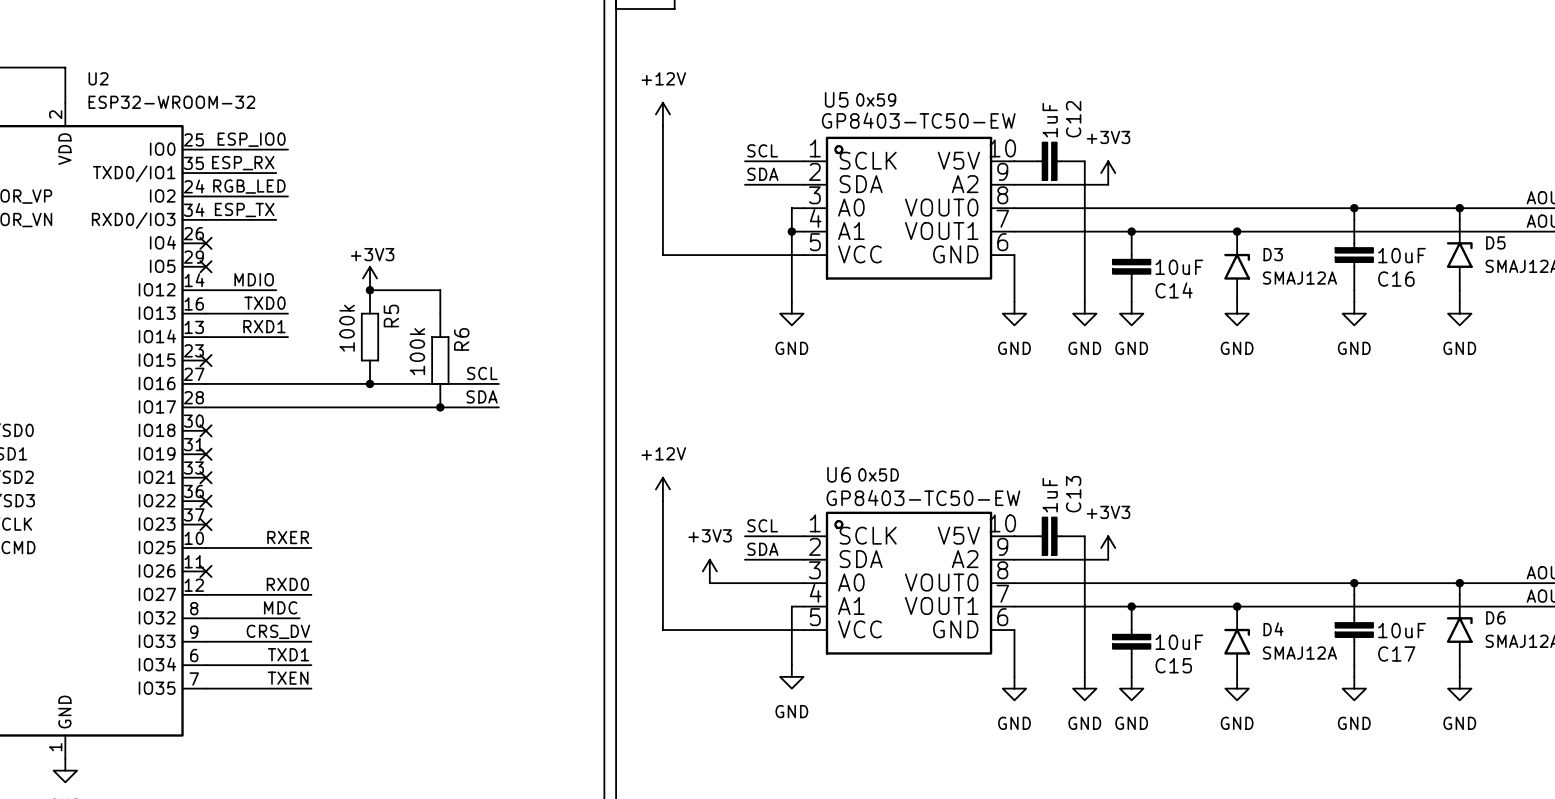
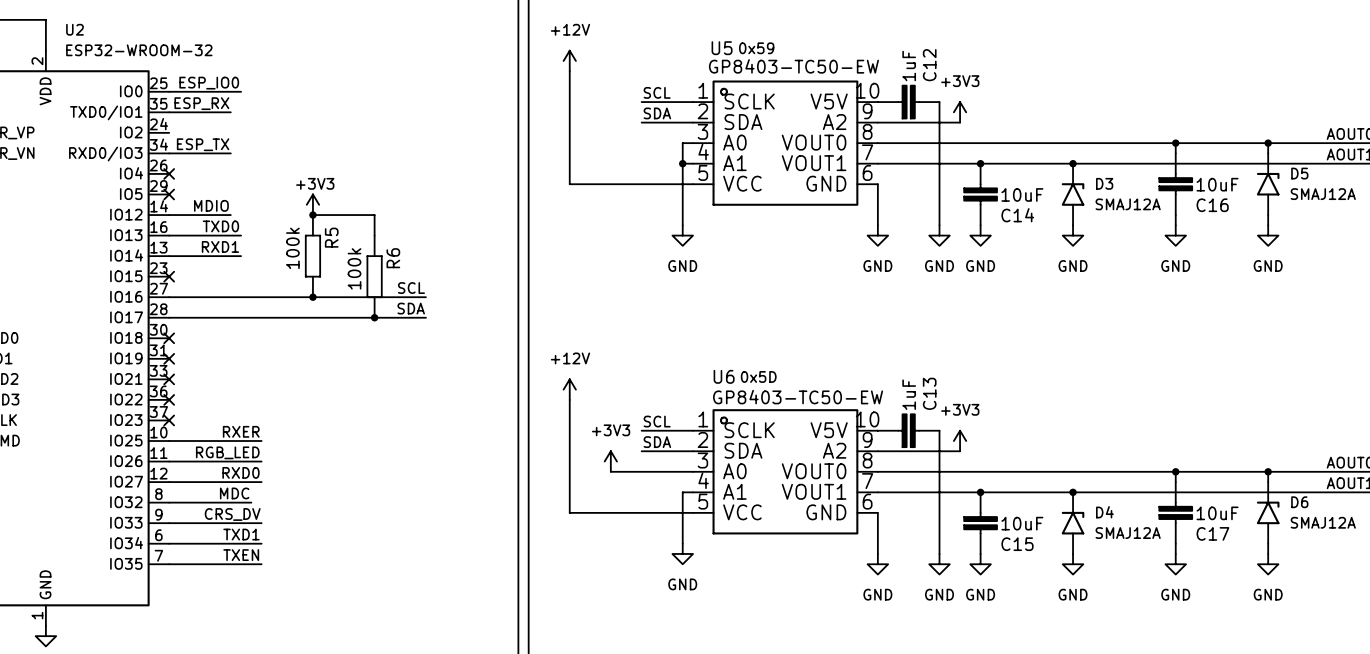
label: RGB_LED (249, 186) -> none
wire: (205, 196) (287, 196) -> none
label: none -> RGB_LED (227, 452)
wire: none -> (169, 461) (261, 461)
no-connect mark: (205, 571) -> none

